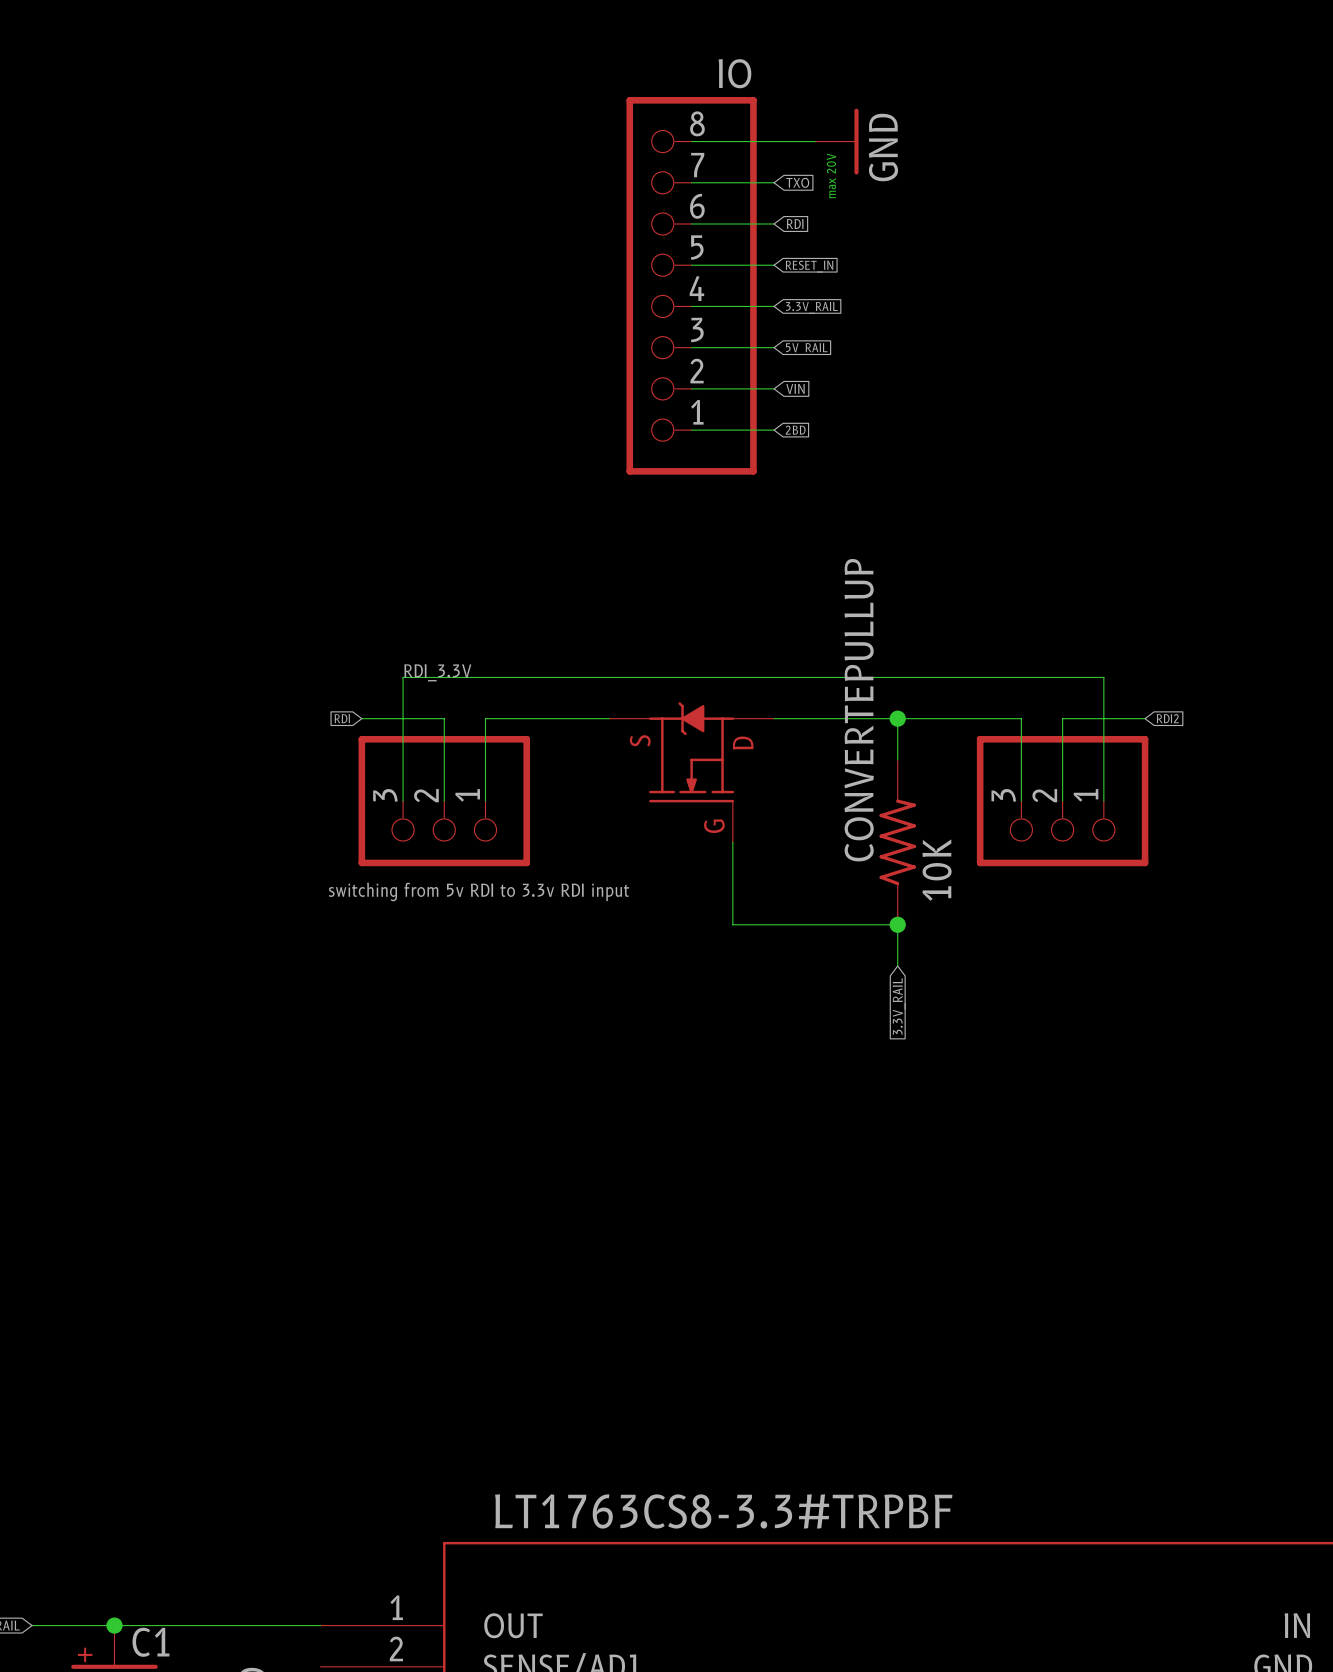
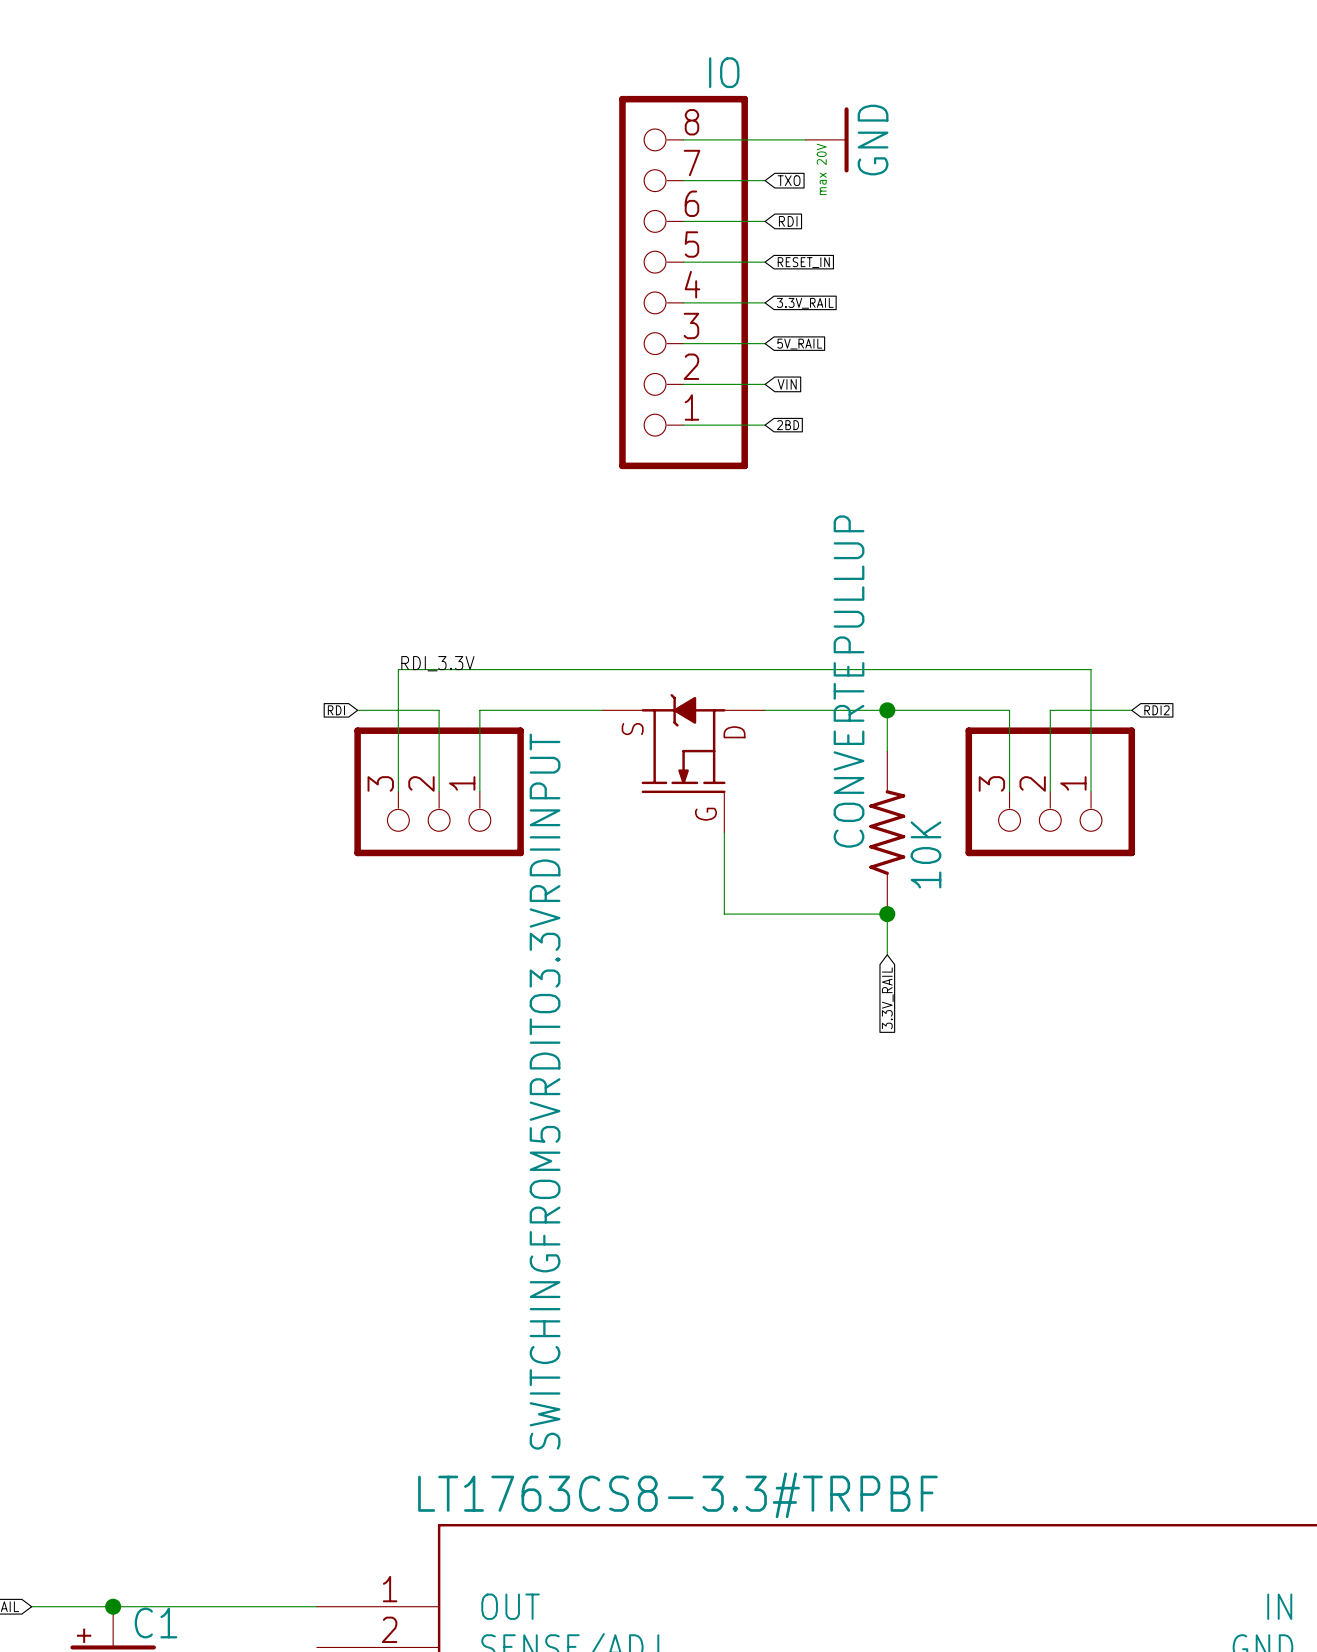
SWITCHINGFROM5VRDITO3.3VRDIINPUT value: switching from 5v RDI to 3.3v RDI input (478, 891) -> none
SWITCHINGFROM5VRDITO3.3VRDIINPUT name: none -> SWITCHINGFROM5VRDITO3.3VRDIINPUT (545, 1091)

